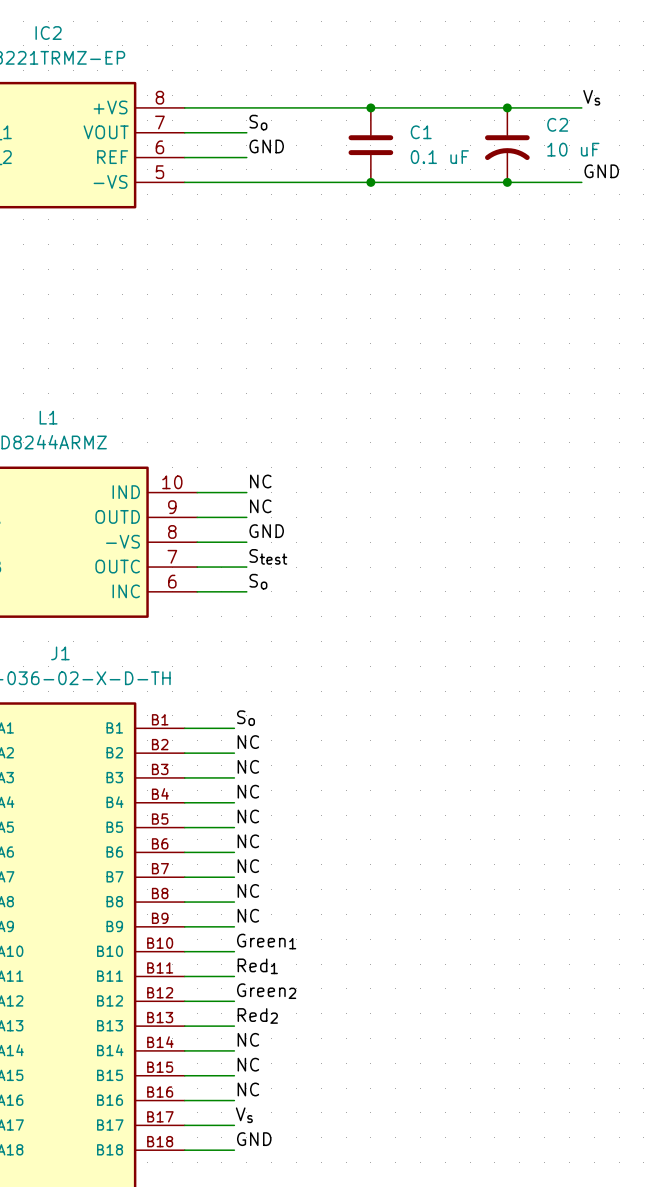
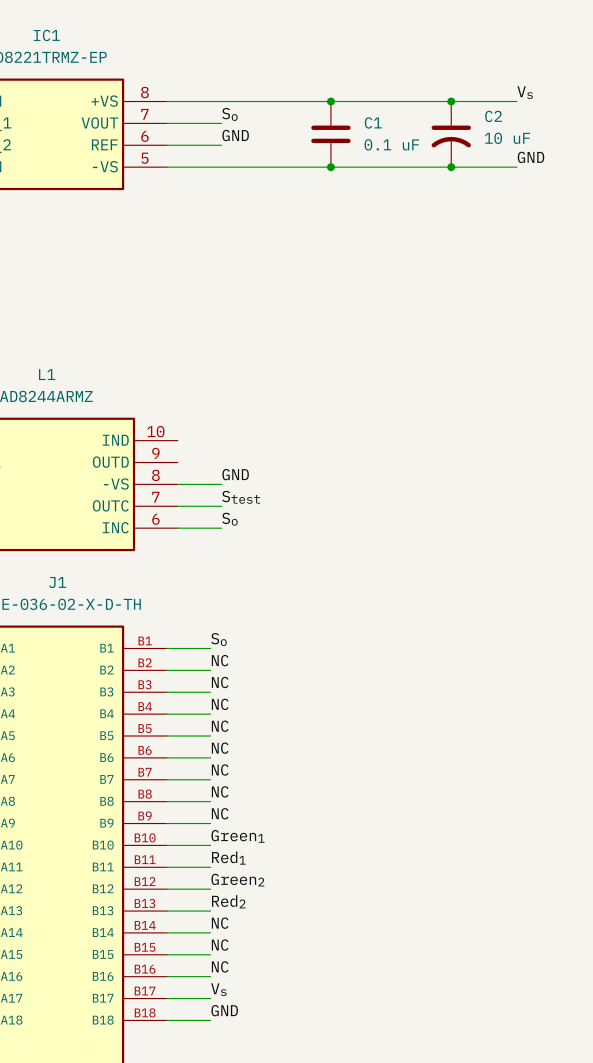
IC2 name: IC2 (48, 33) -> IC1 (46, 35)
label: NC (260, 481) -> none
wire: (197, 492) (246, 492) -> none
label: NC (260, 506) -> none
wire: (197, 517) (246, 517) -> none

